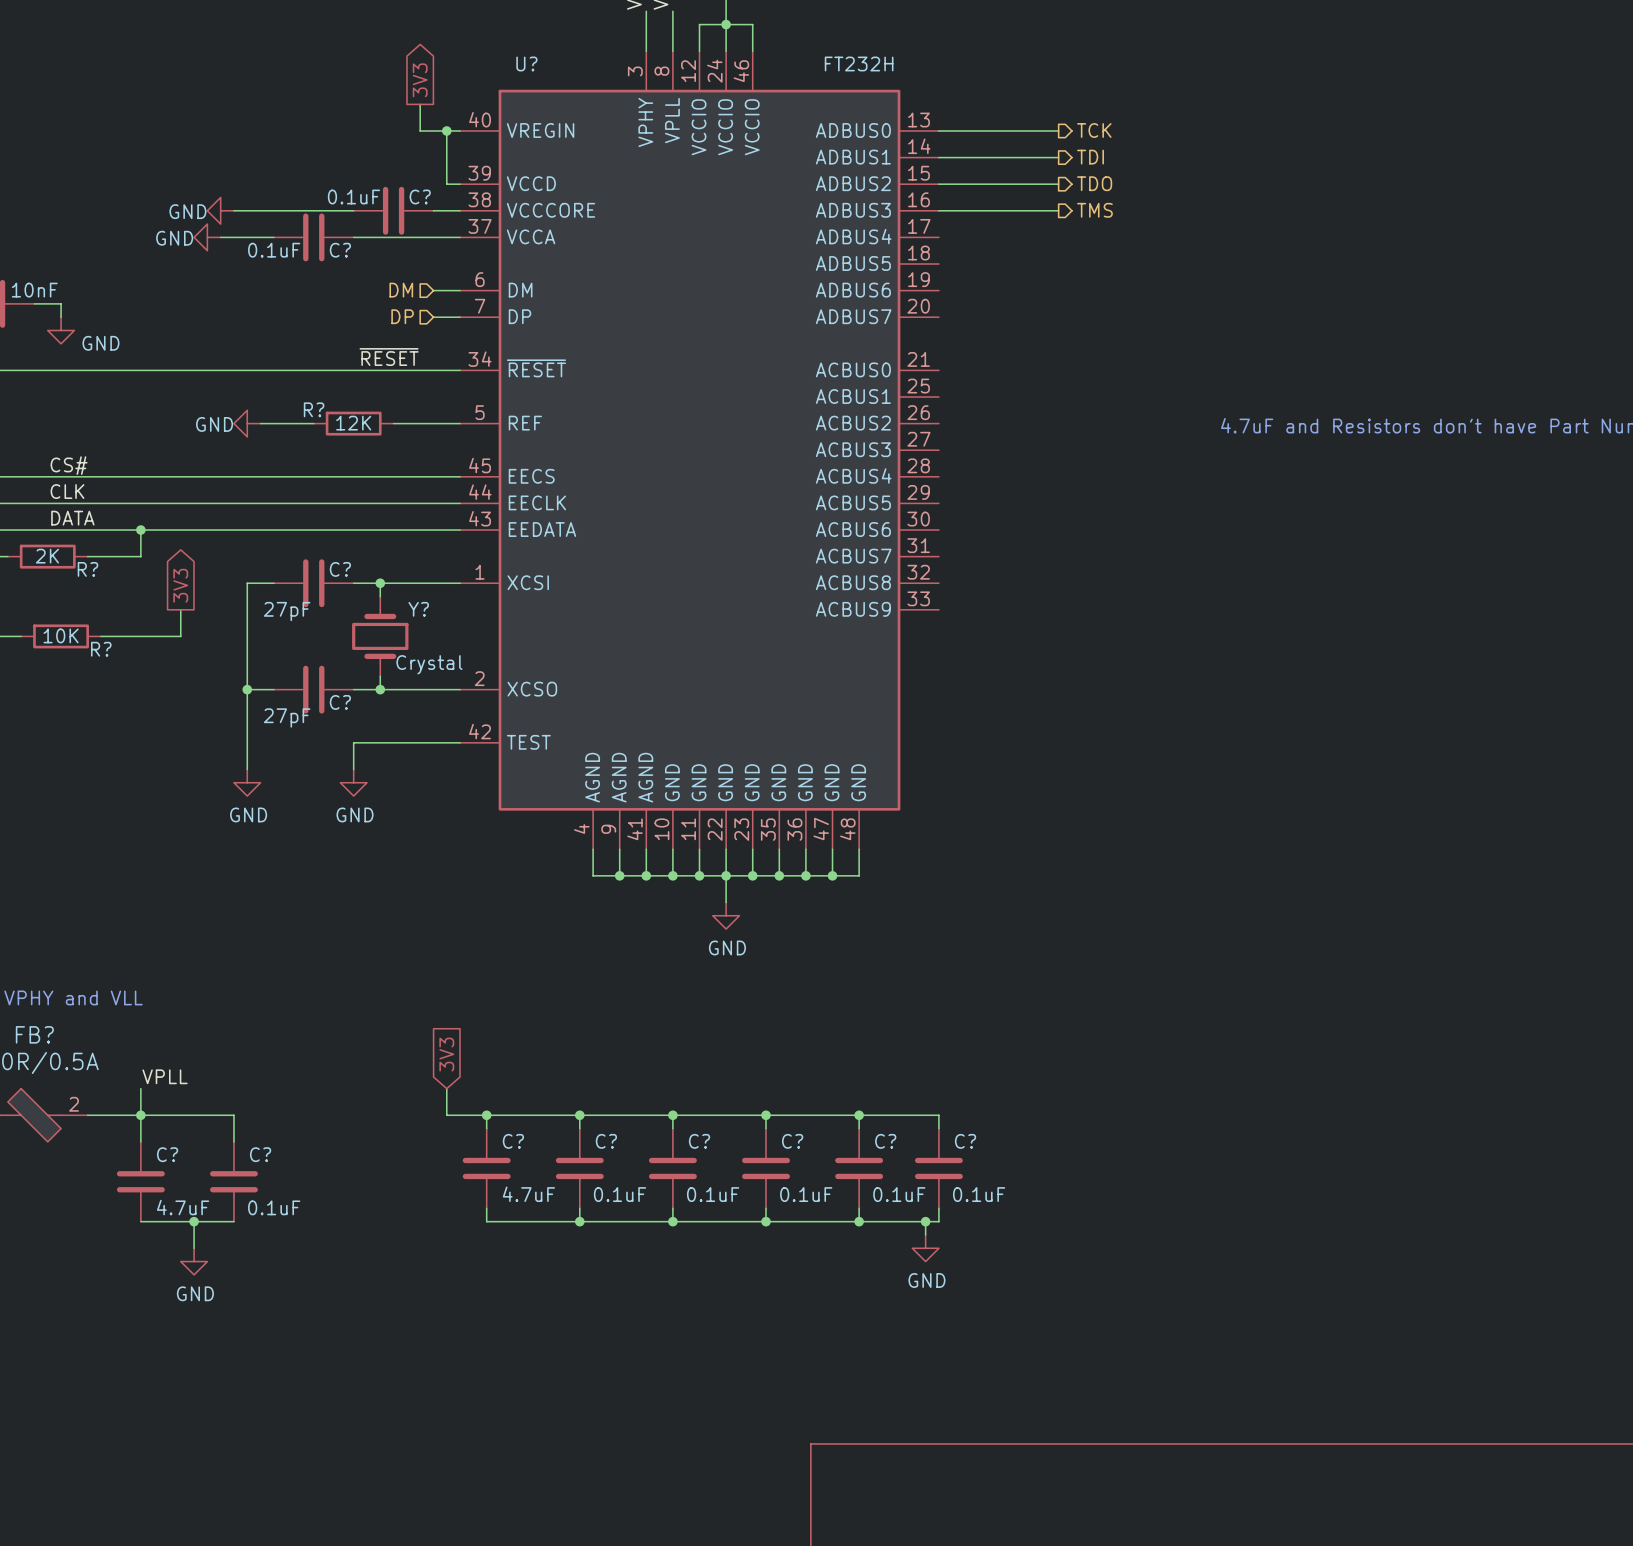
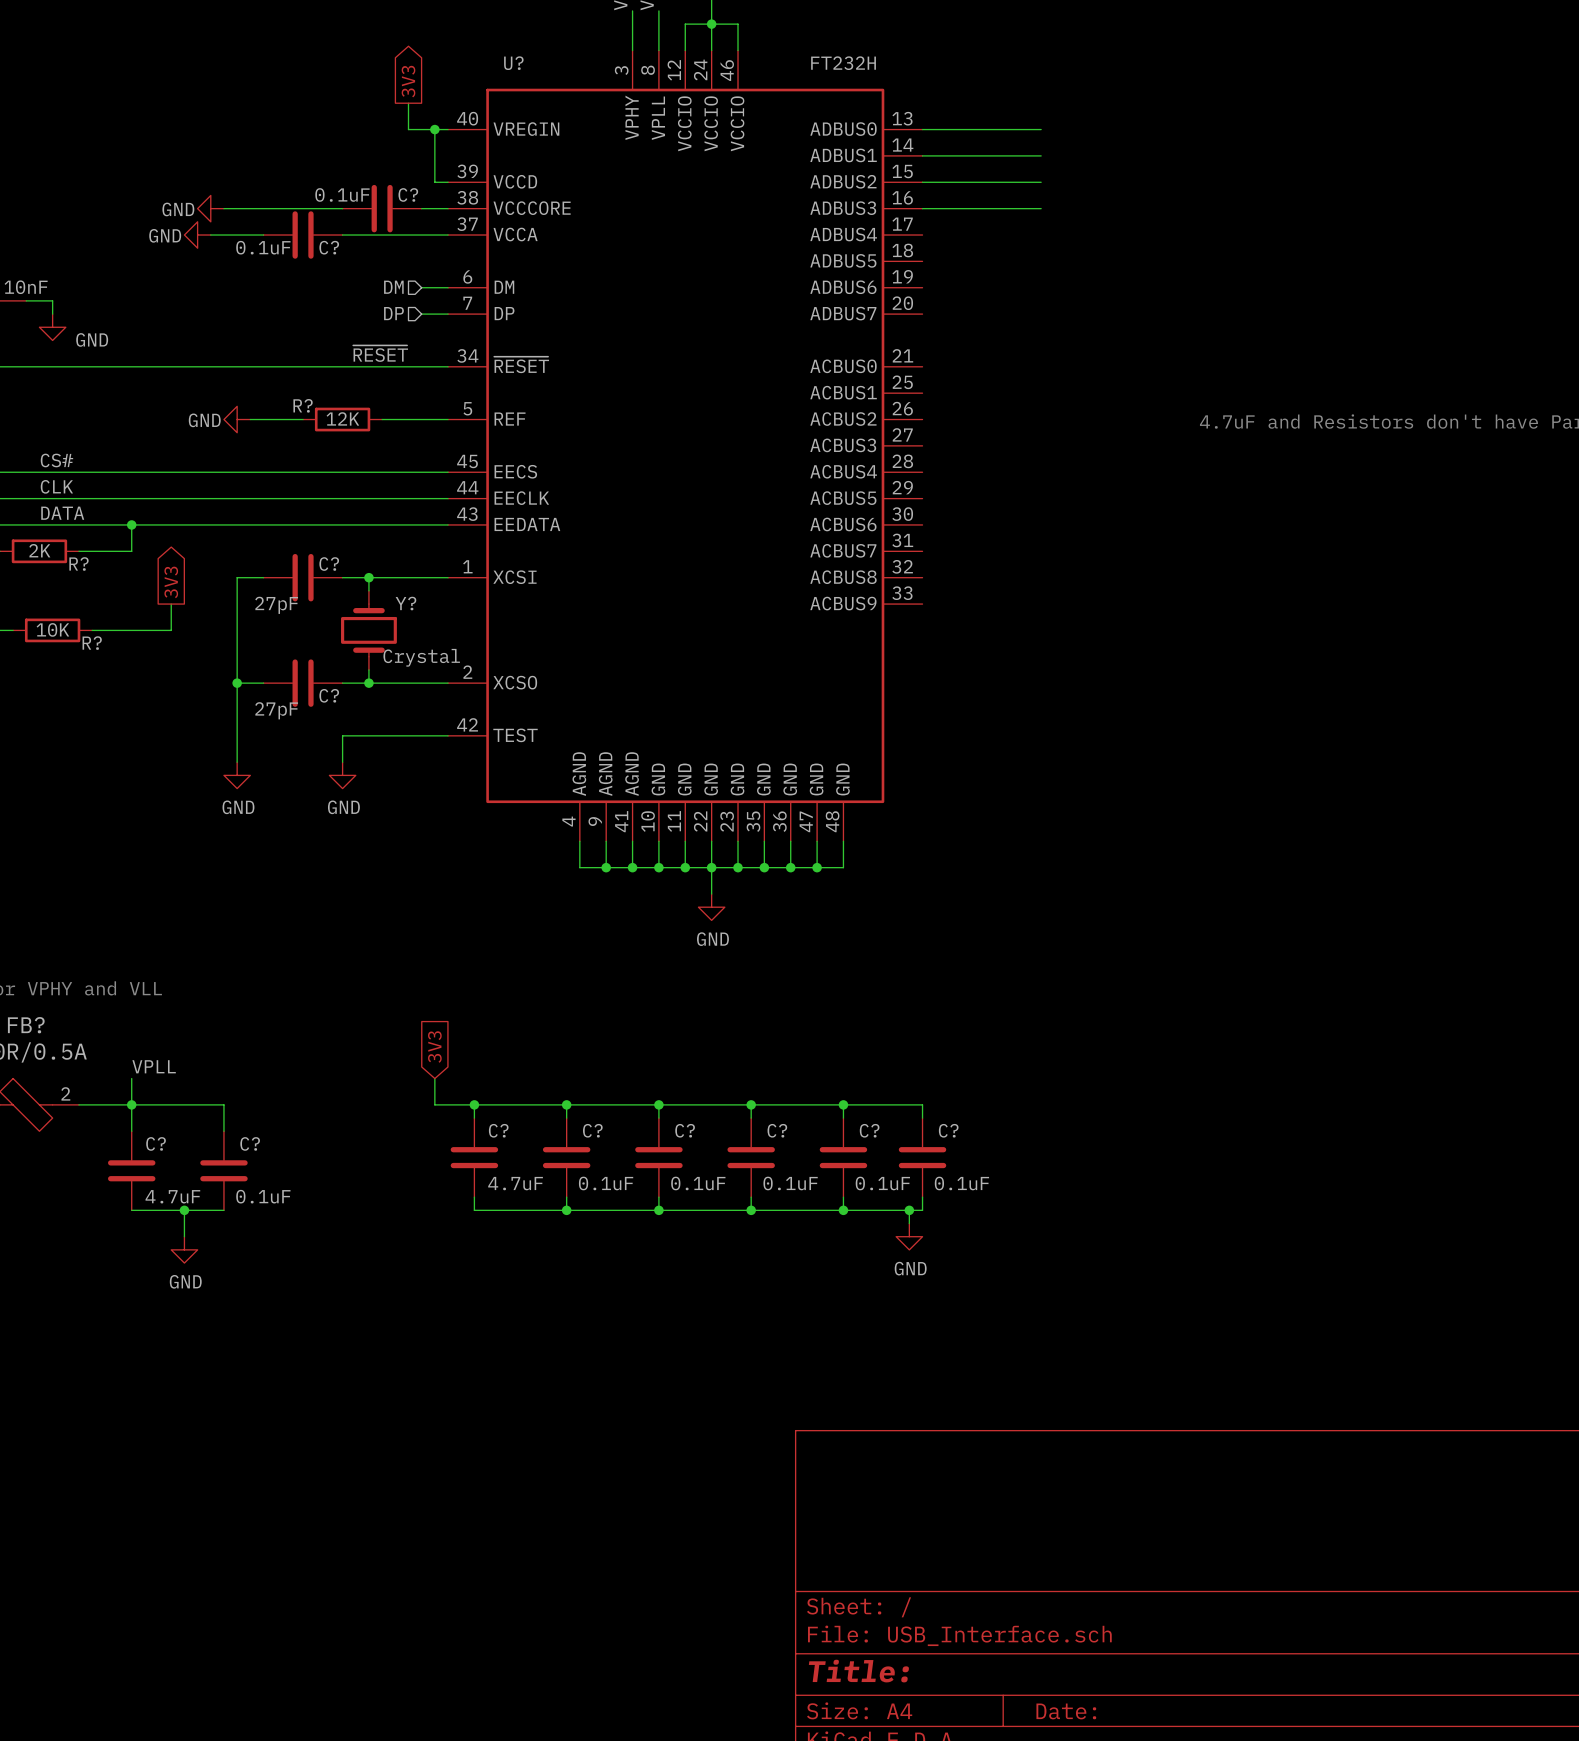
hierarchical label: TCK (1094, 130) -> none
hierarchical label: TDI (1090, 157) -> none
hierarchical label: TDO (1094, 183) -> none
hierarchical label: TMS (1094, 210) -> none

